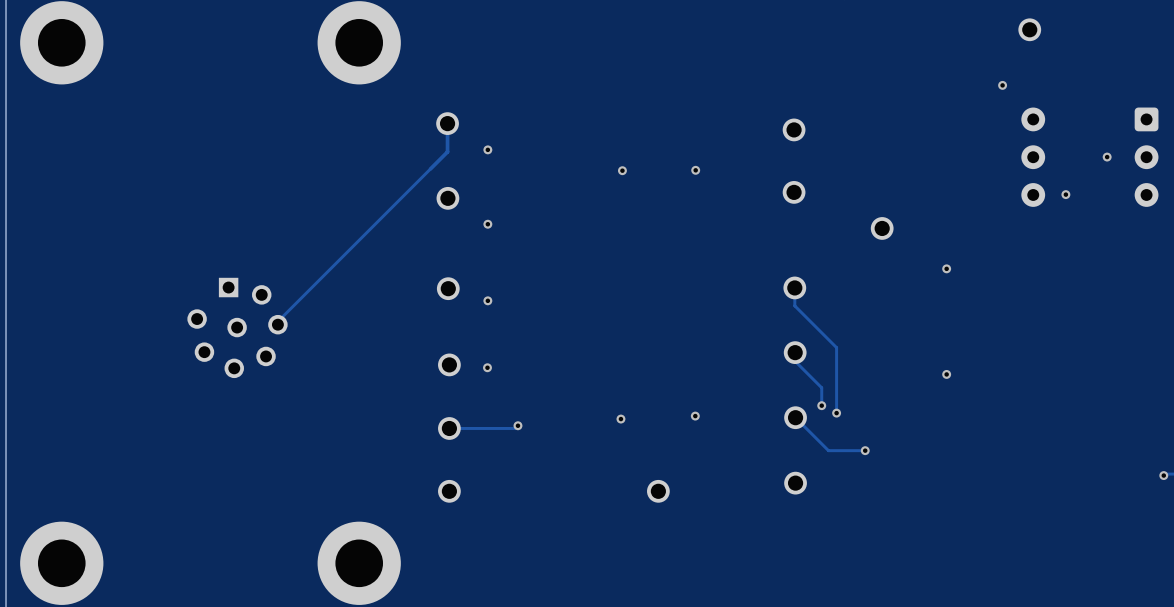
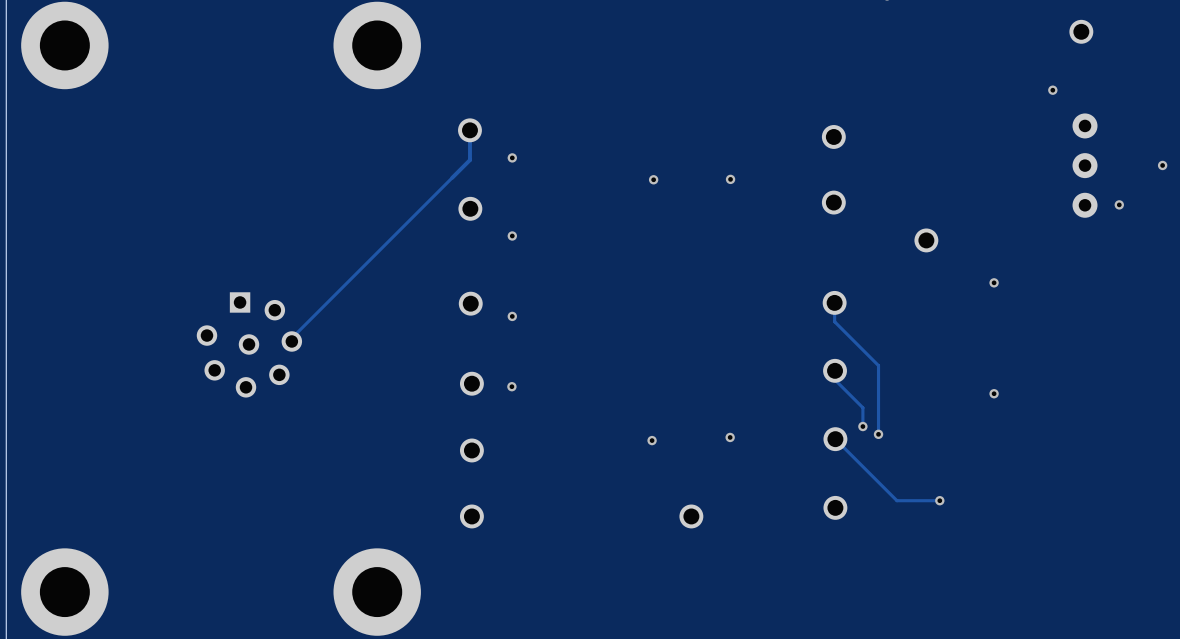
track: (517, 425) (515, 428) (449, 428) -> none
via: (517, 425) -> none
track: (865, 450) (828, 450) -> (939, 500) (896, 500) (870, 473)
via position: (865, 450) -> (939, 500)

